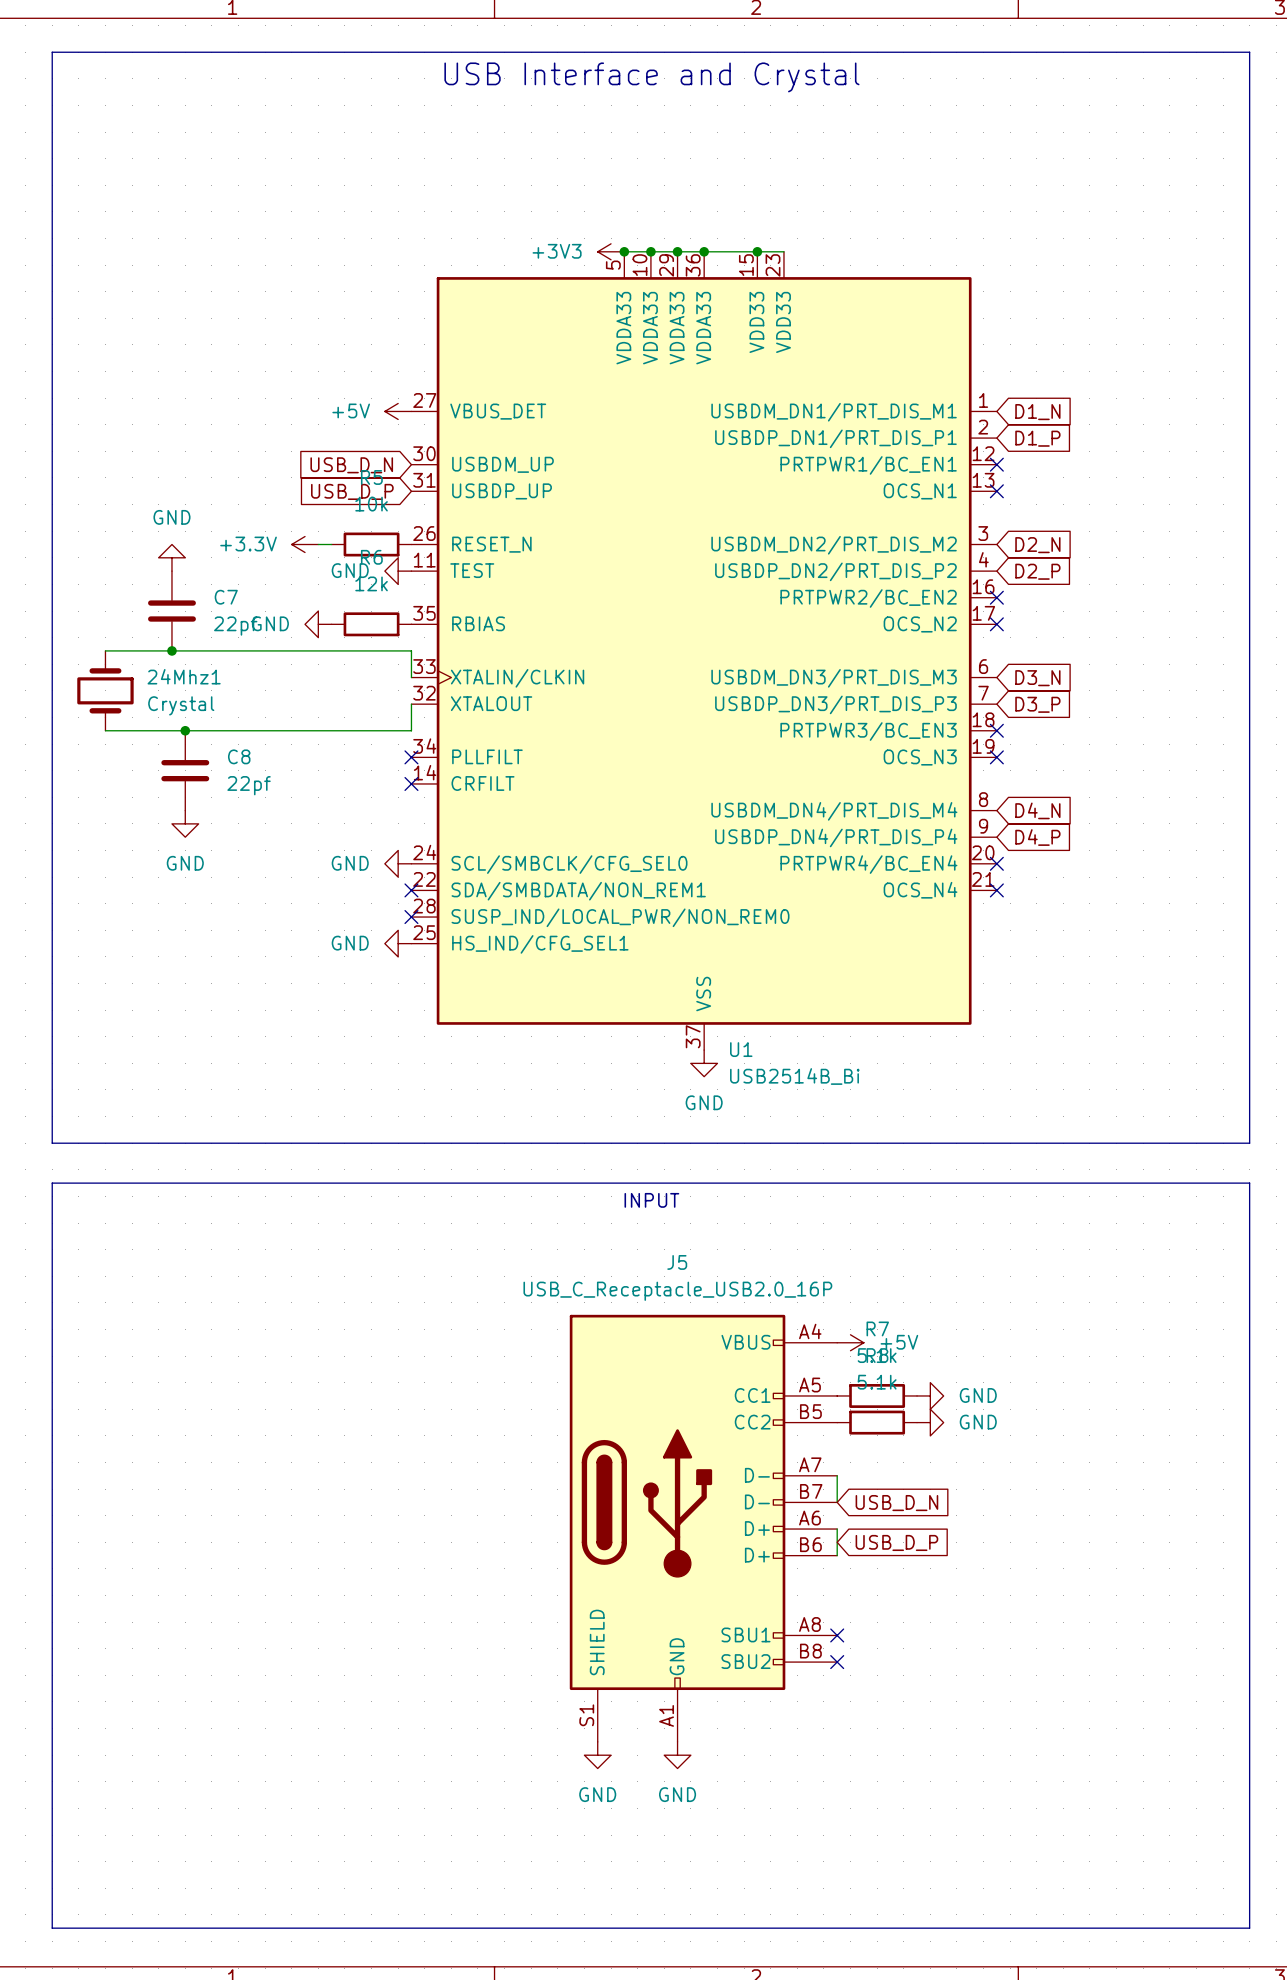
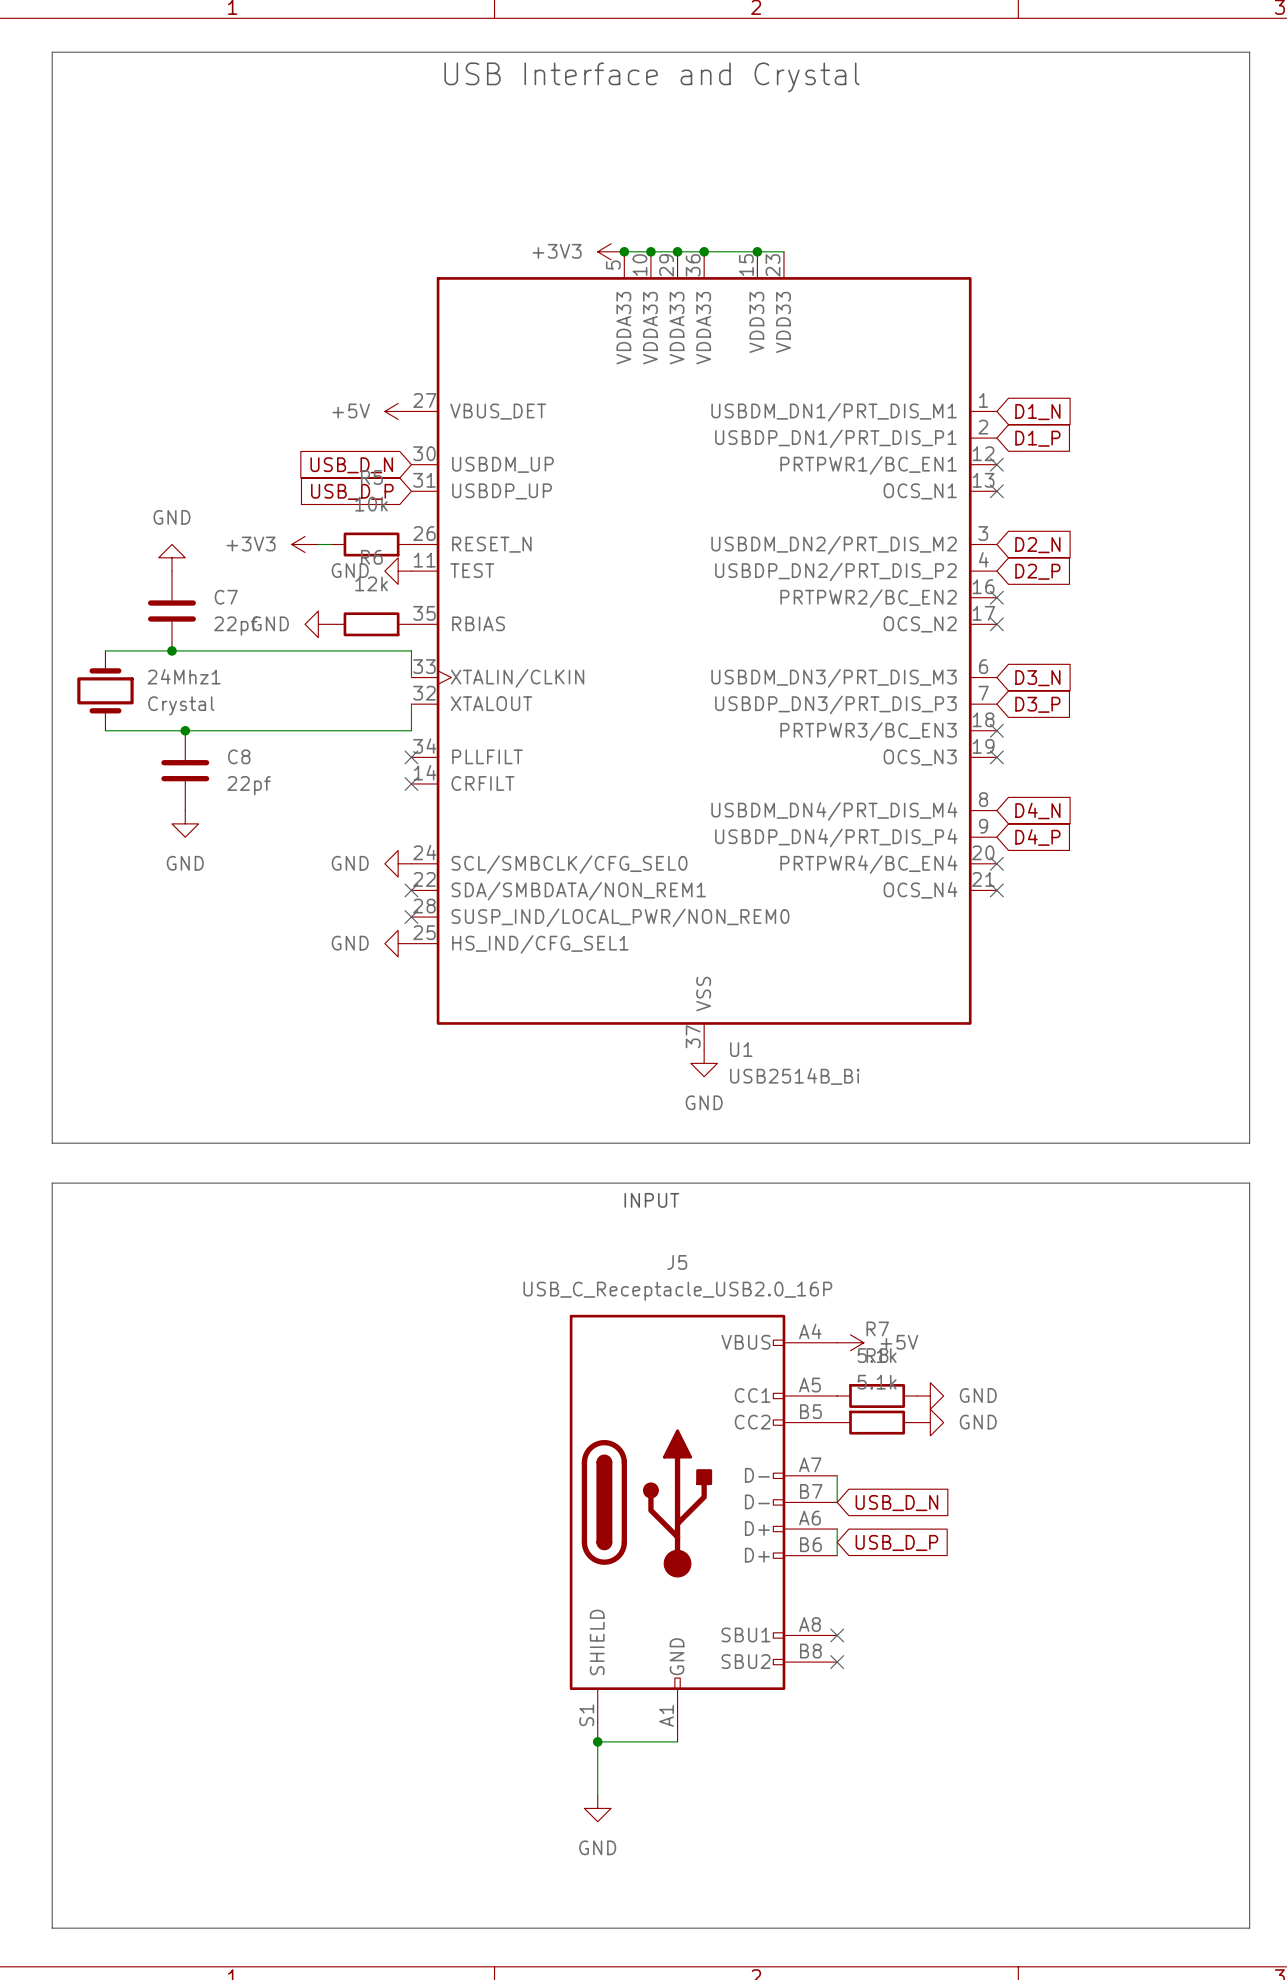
power symbol: +3.3V (305, 544) -> +3V3 (305, 544)
junction: none -> (597, 1741)
wire: none -> (677, 1741) (597, 1741) (597, 1795)
power symbol: GND (597, 1755) -> none
power symbol: GND (677, 1755) -> none
power symbol: none -> GND (597, 1808)

